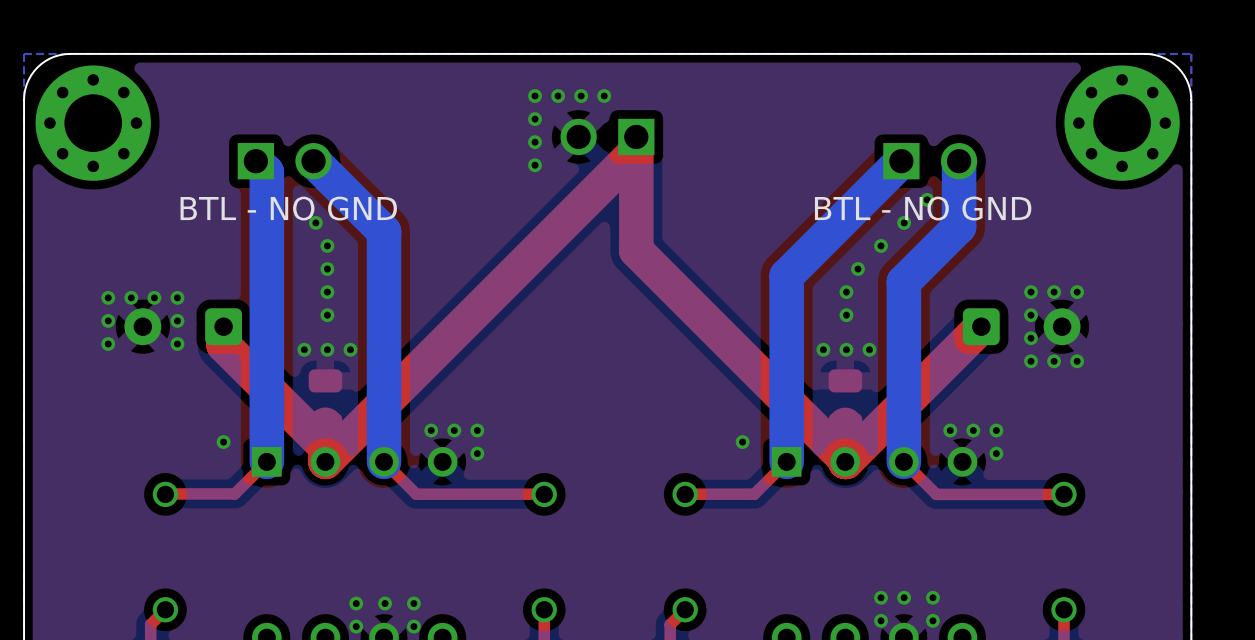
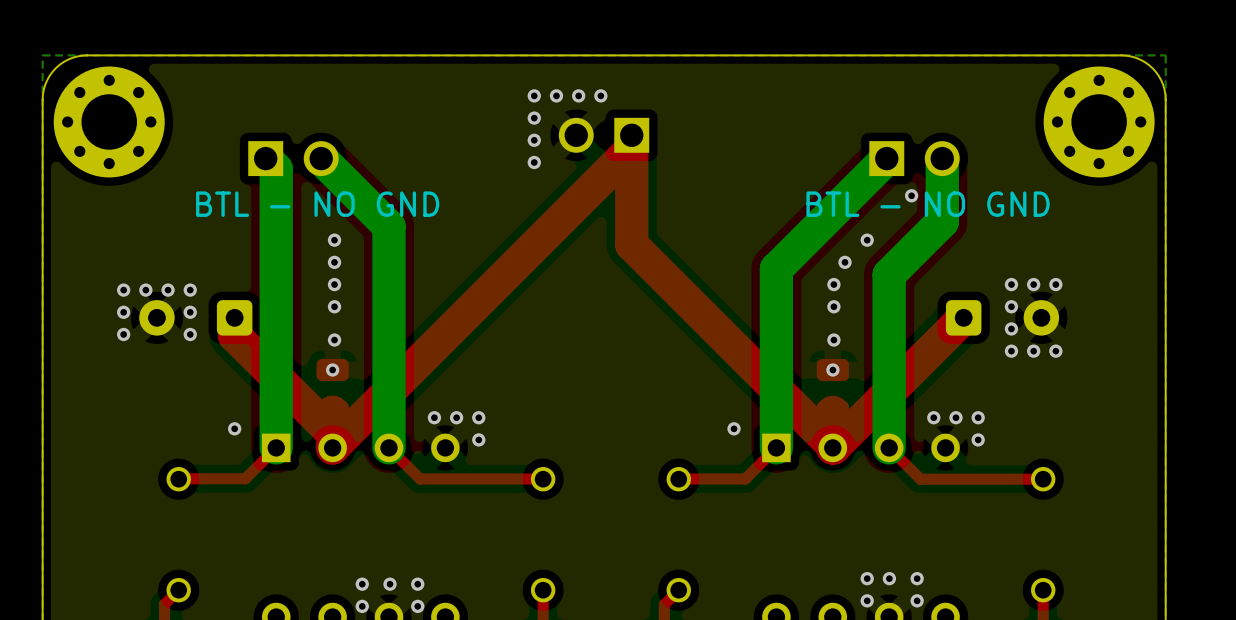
via: (315, 222) -> none
via: (904, 222) -> none
via: (304, 349) -> none
via: (350, 349) -> none
via: (823, 349) -> none
via: (869, 349) -> none
via: none -> (332, 370)
via: none -> (832, 370)

